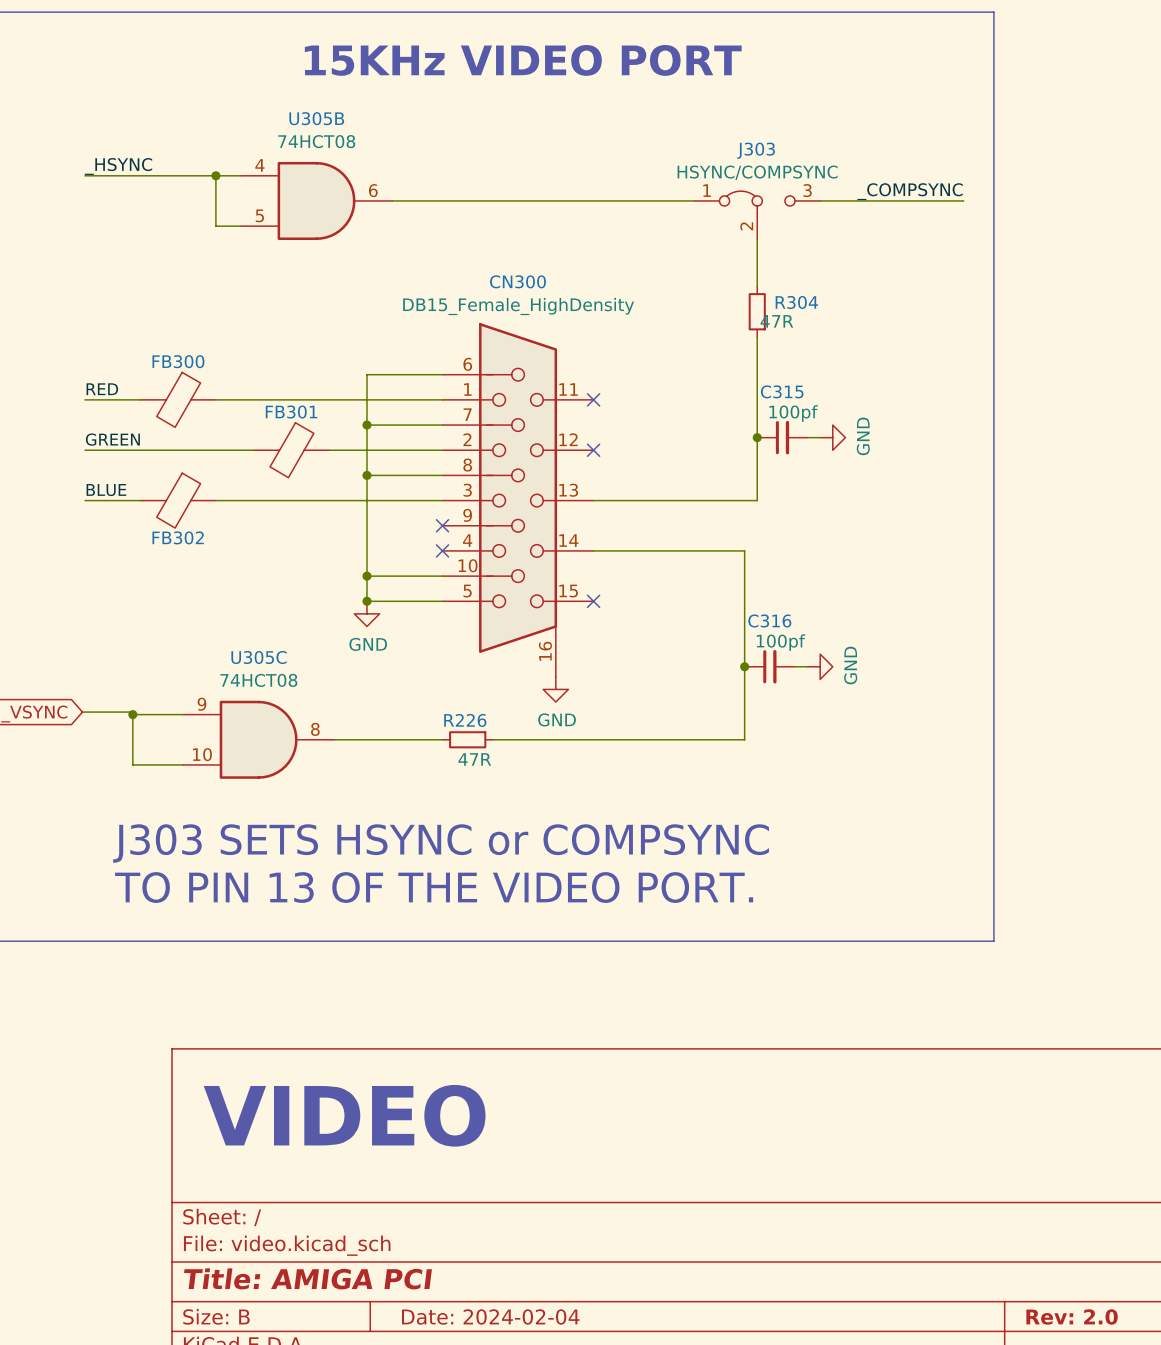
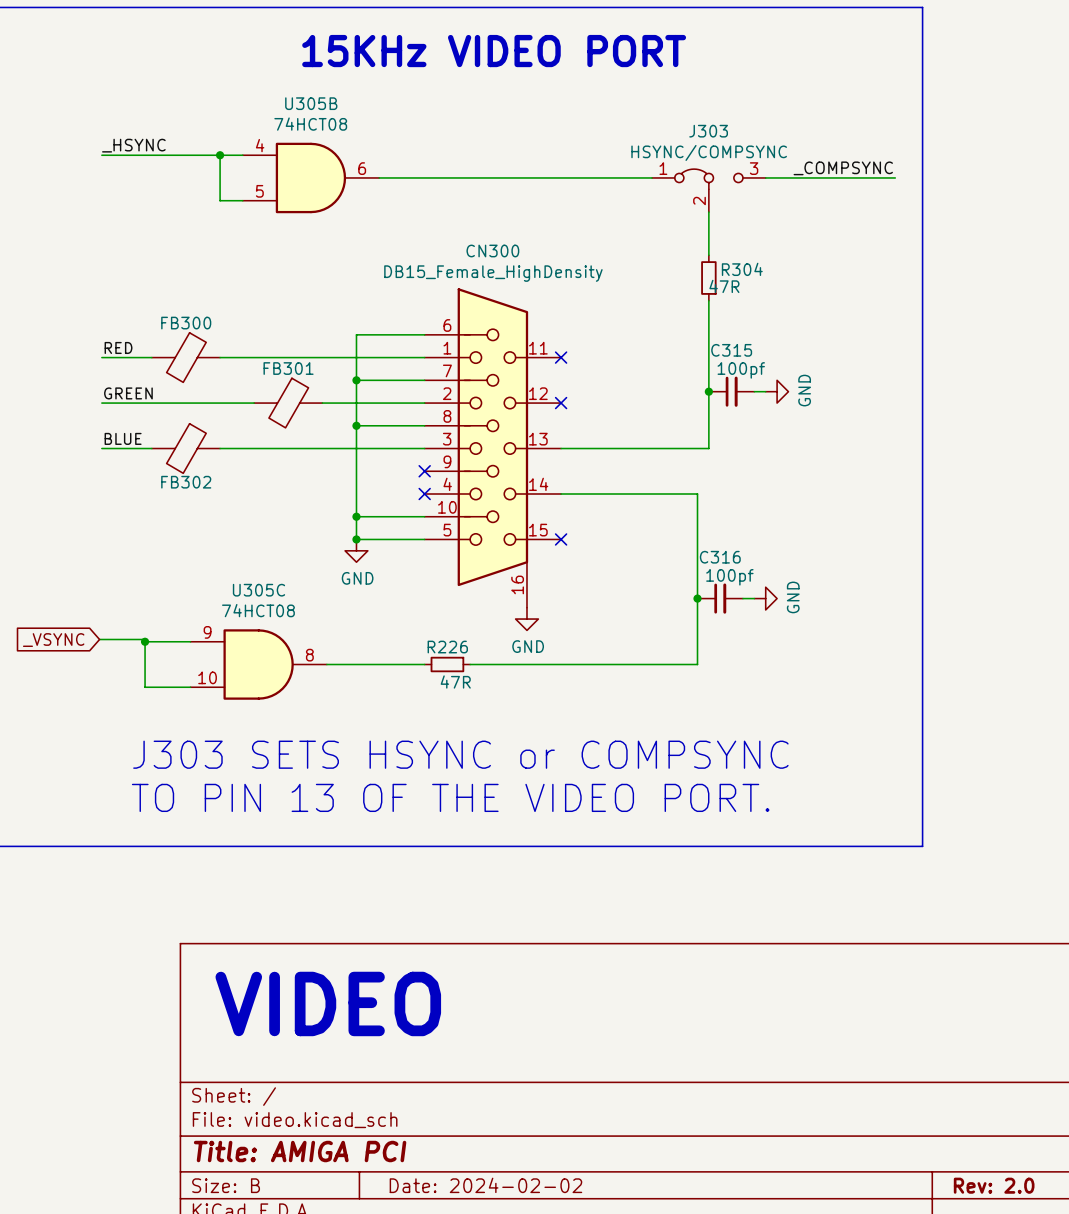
title block: Date: 2024-02-04 (490, 1316) -> Date: 2024-02-02 (485, 1185)

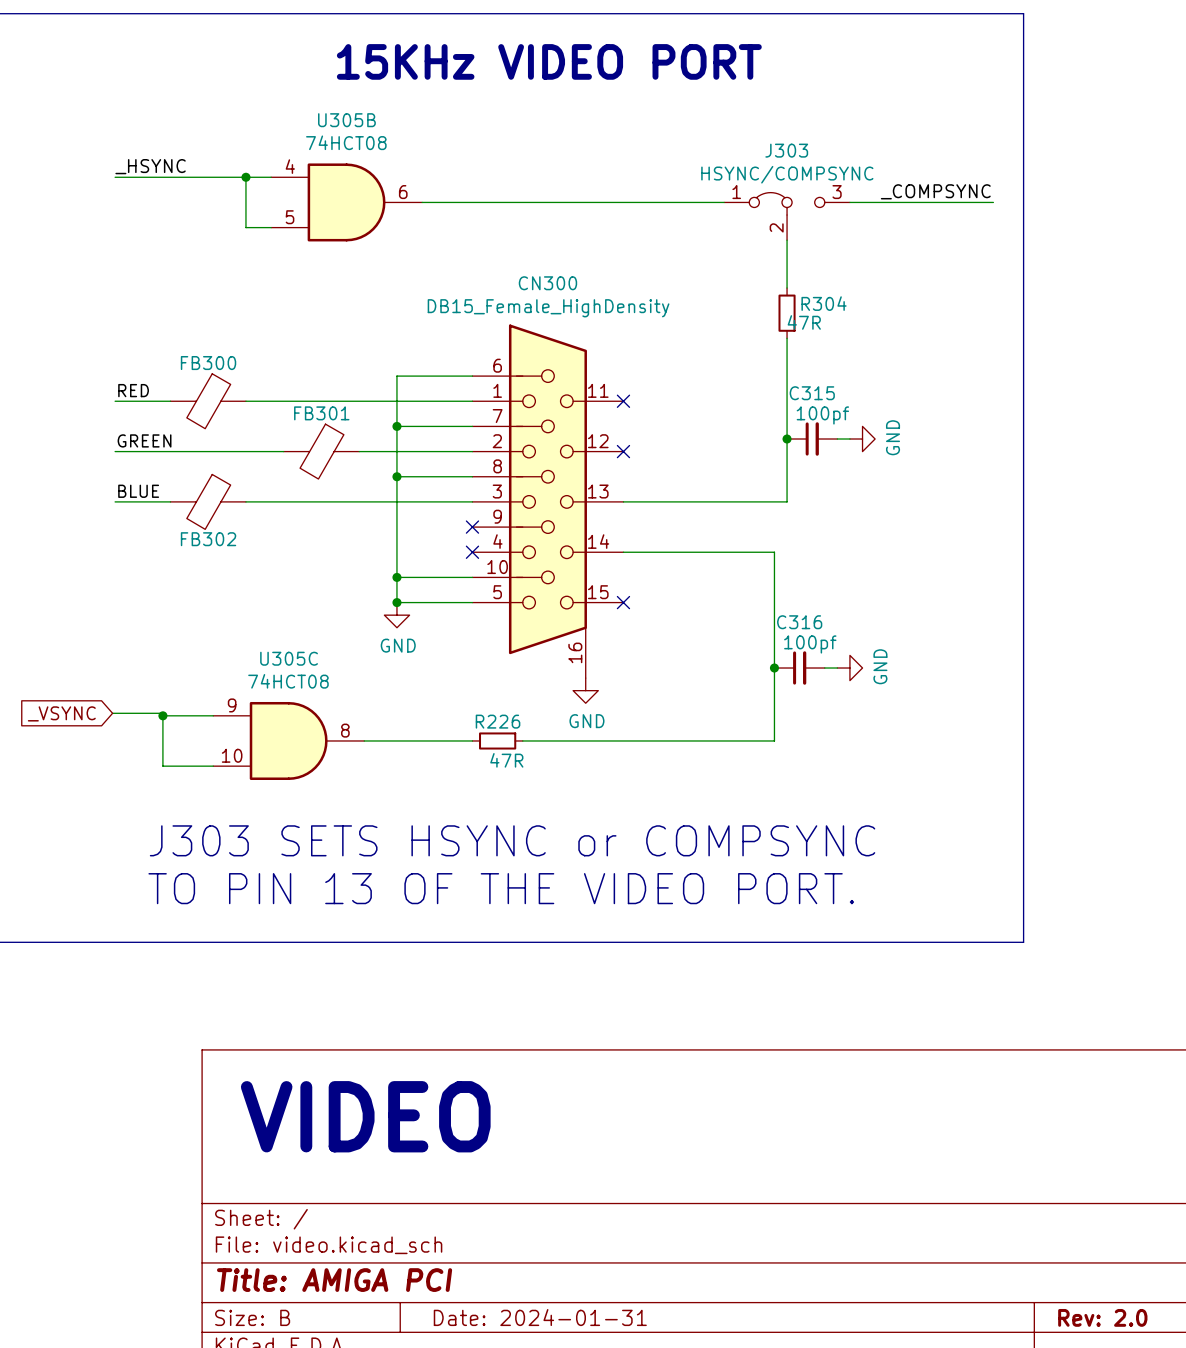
title block: Date: 2024-02-02 (485, 1185) -> Date: 2024-01-31 (540, 1317)

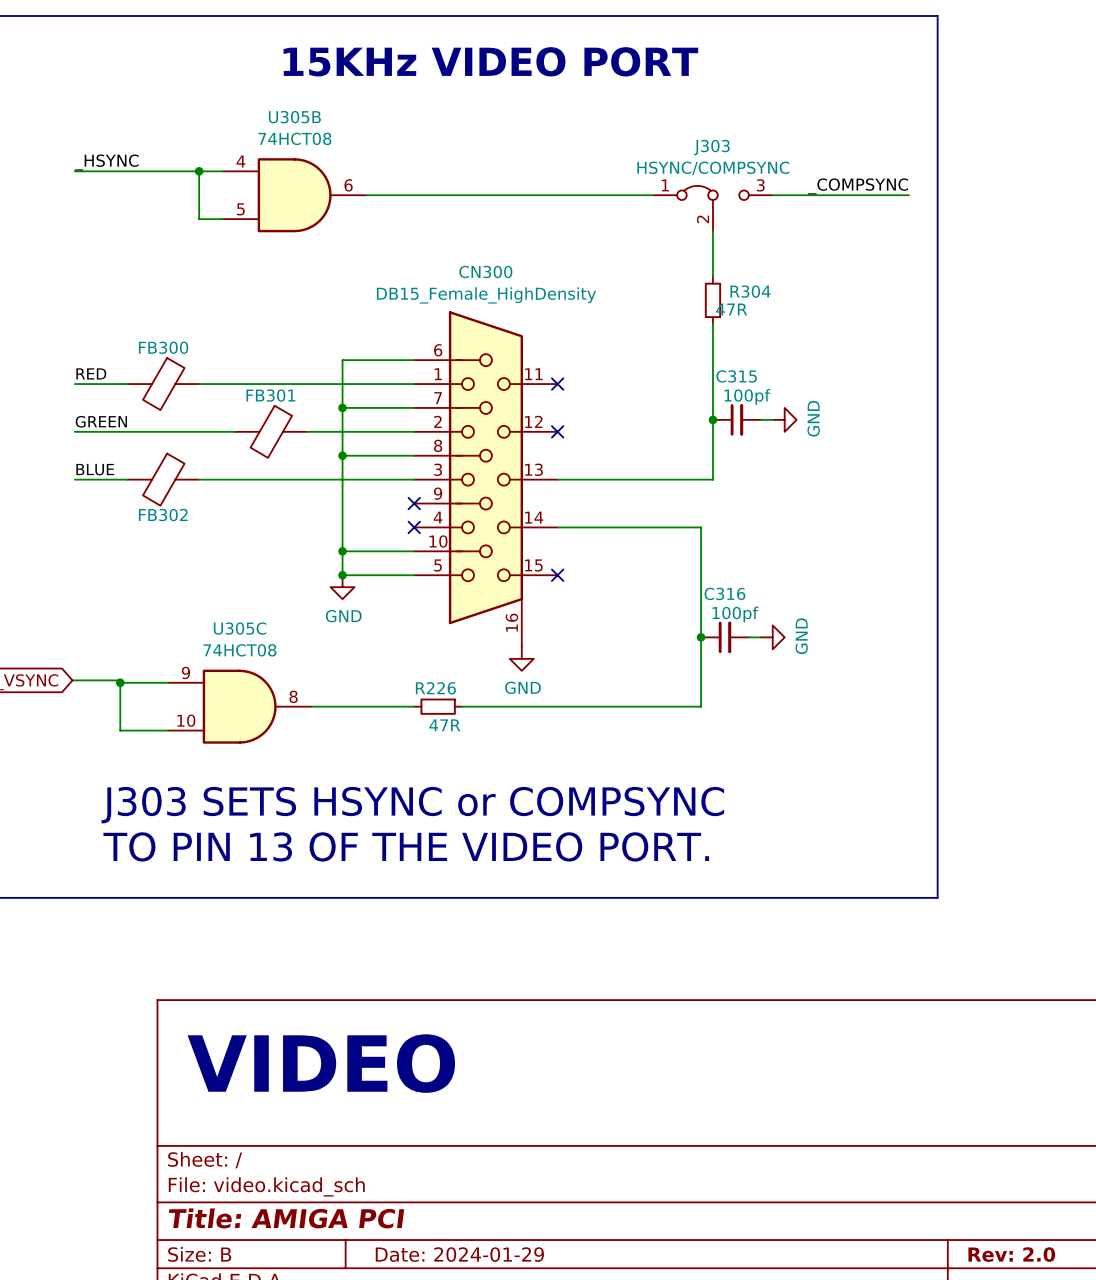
title block: Date: 2024-01-31 (540, 1317) -> Date: 2024-01-29 (459, 1254)

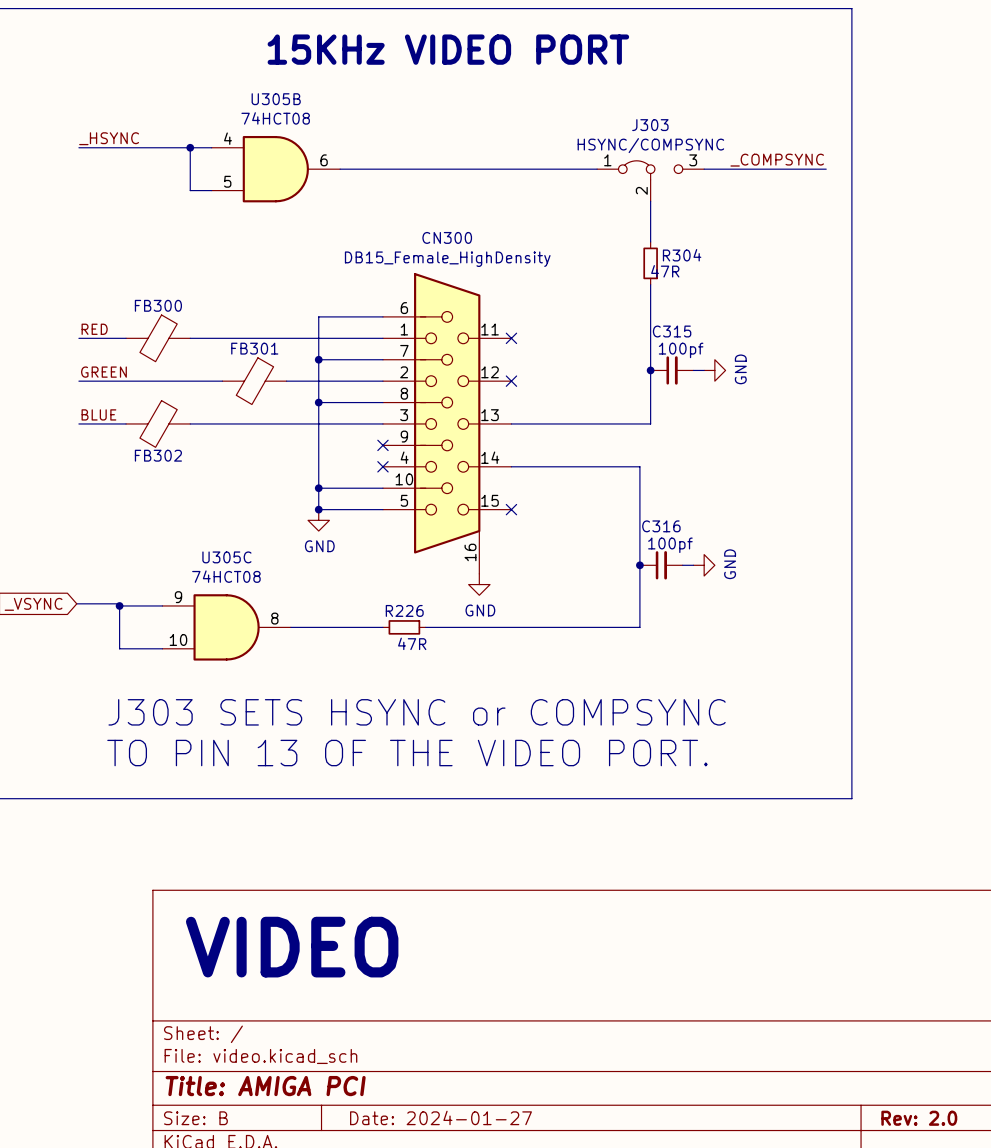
title block: Date: 2024-01-29 (459, 1254) -> Date: 2024-01-27 (440, 1117)

